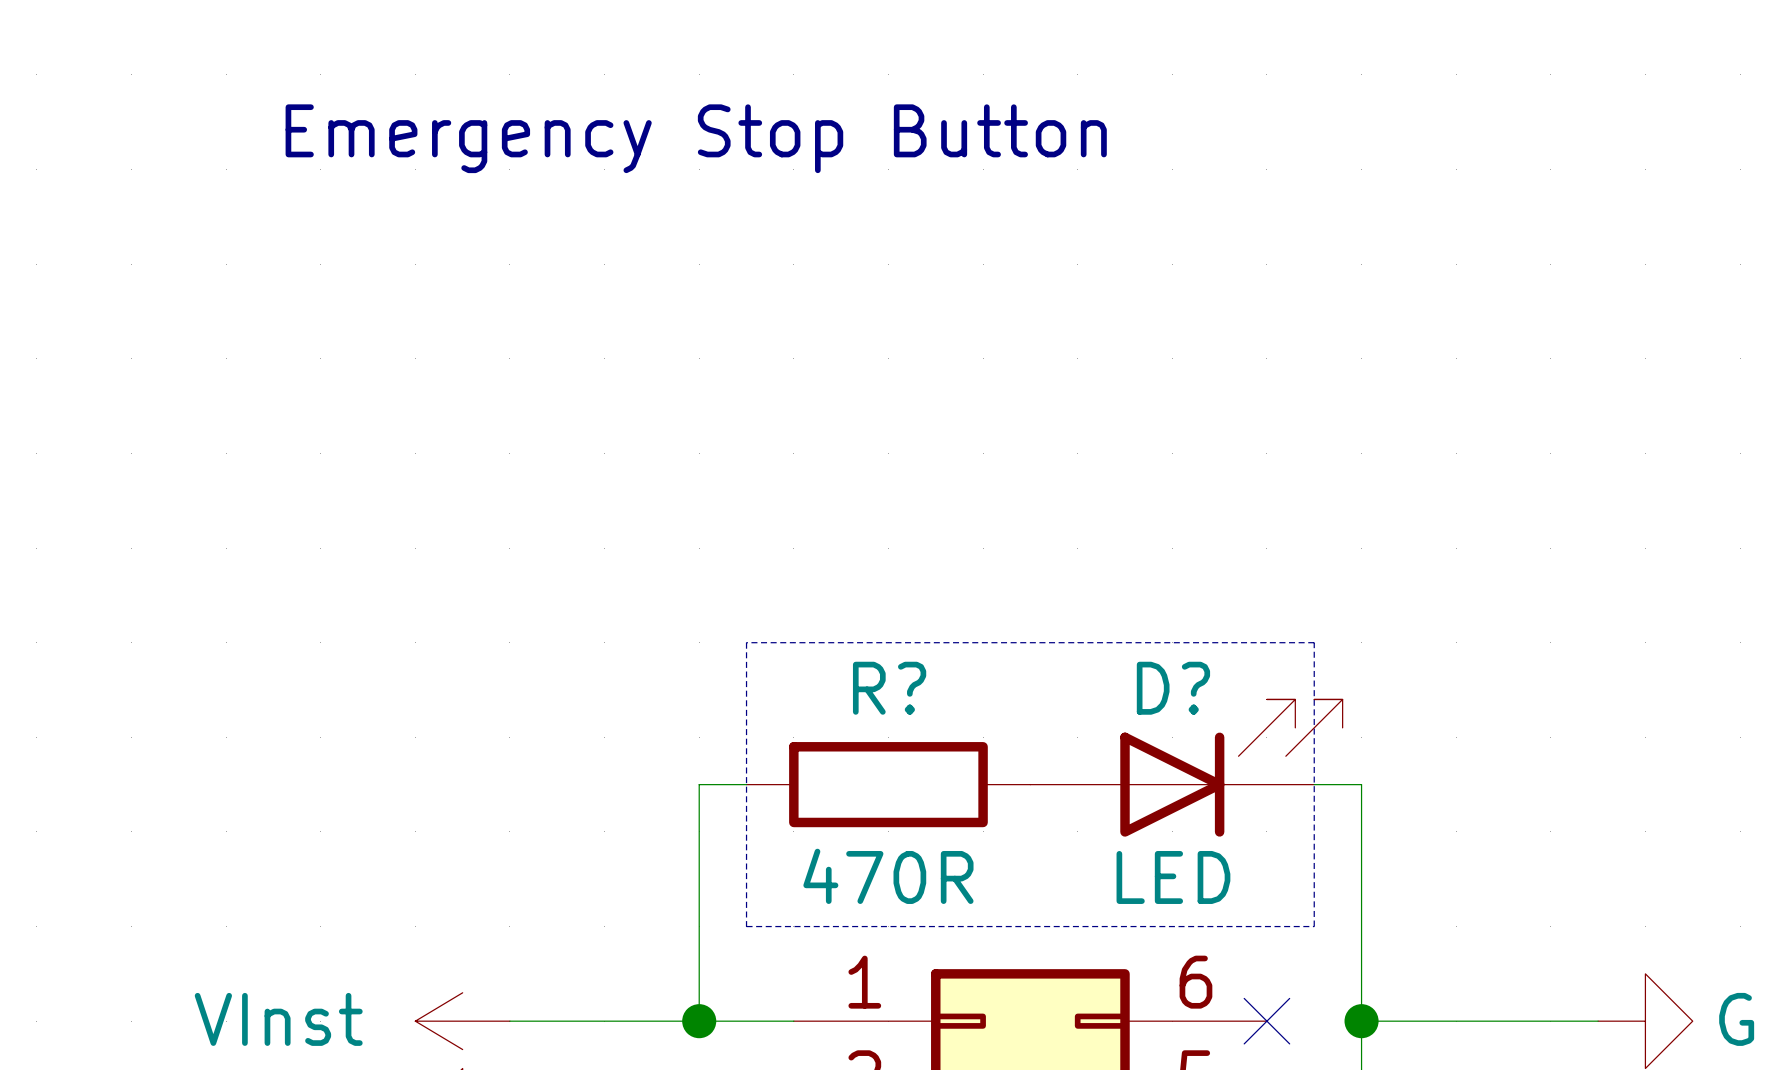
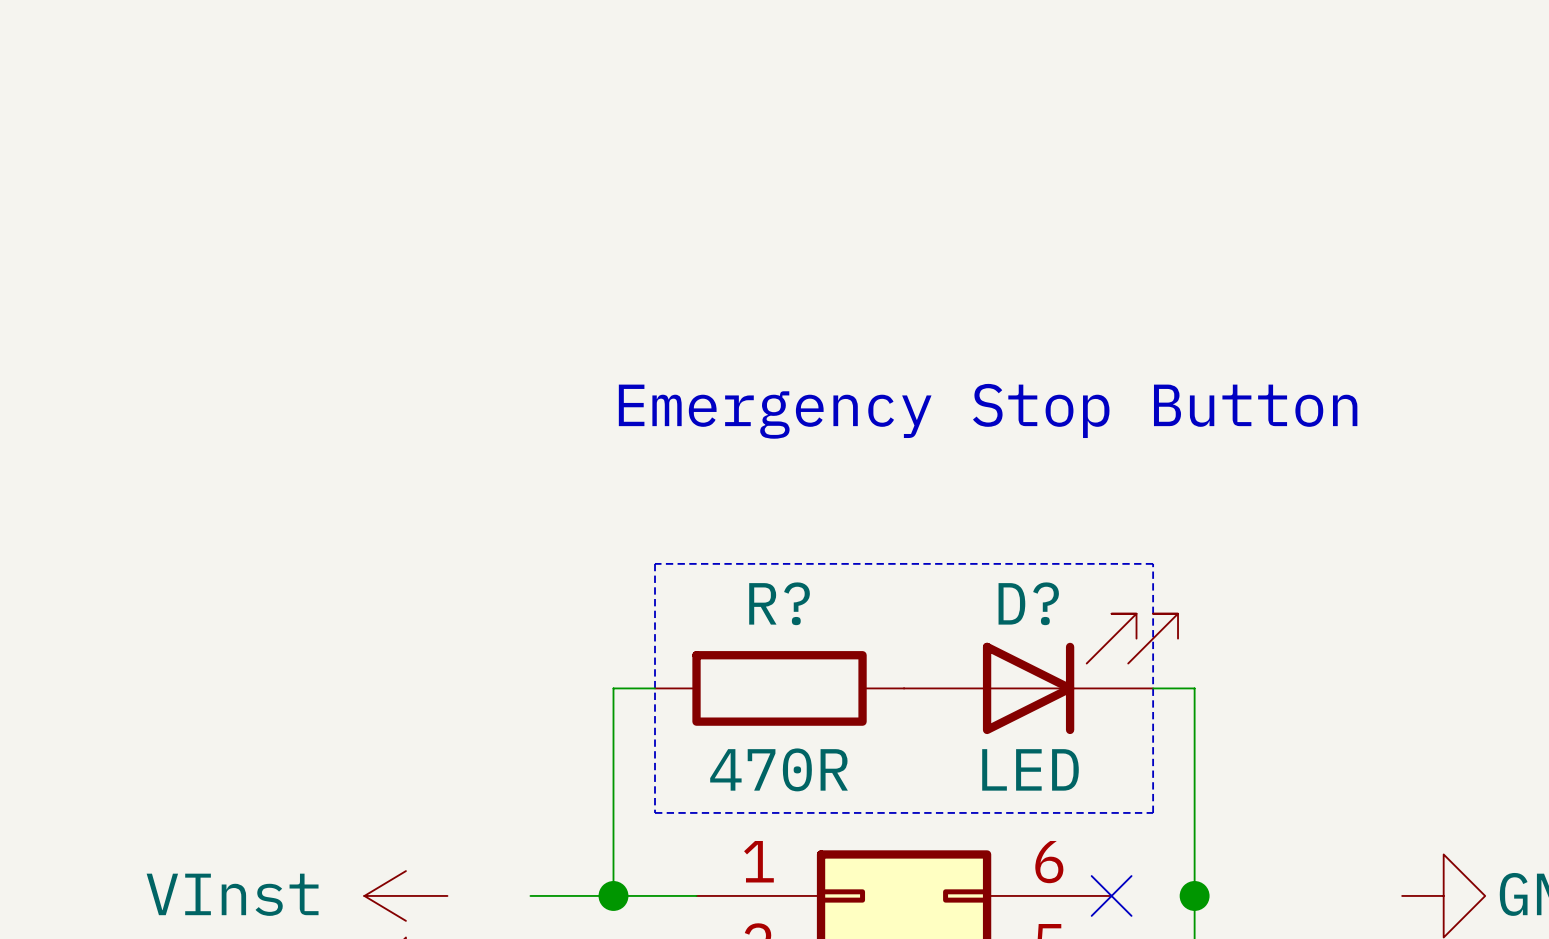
text position: Emergency Stop Button (696, 138) -> Emergency Stop Button (988, 411)
wire: (509, 1021) (604, 1021) -> none
wire: (1361, 1021) (1598, 1021) -> none

